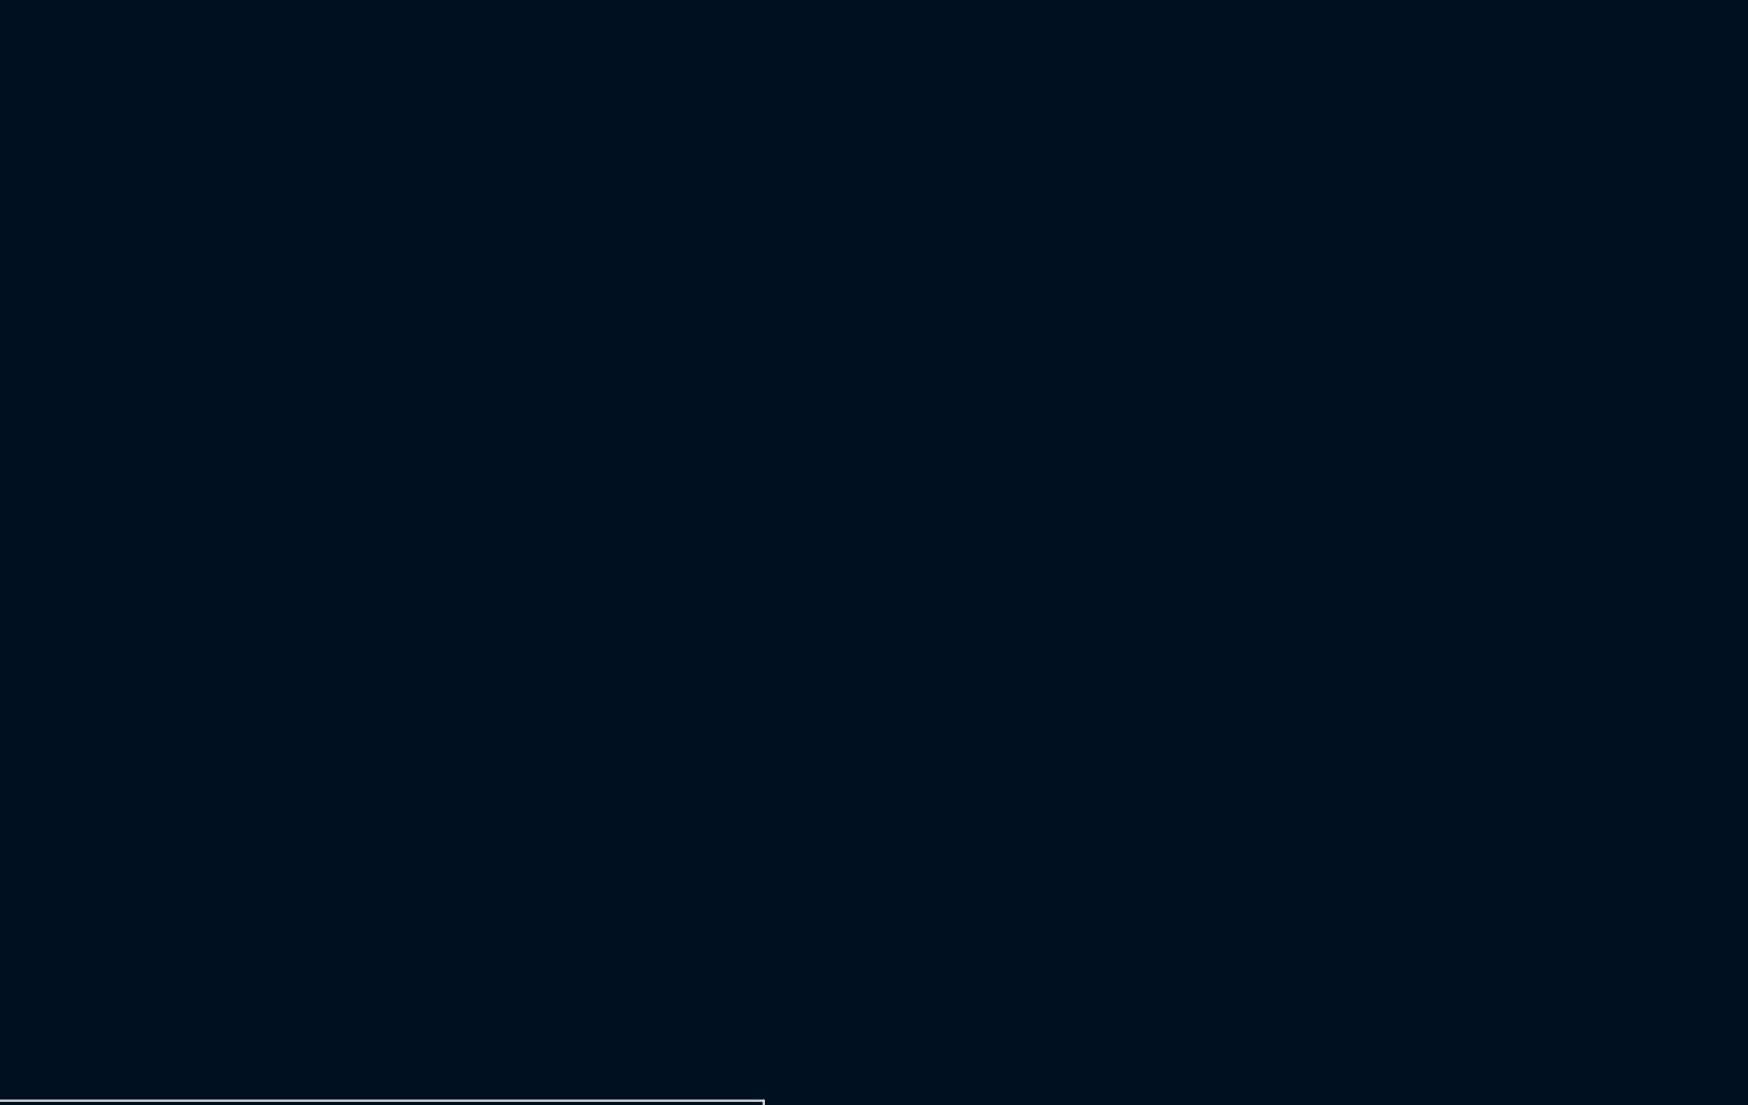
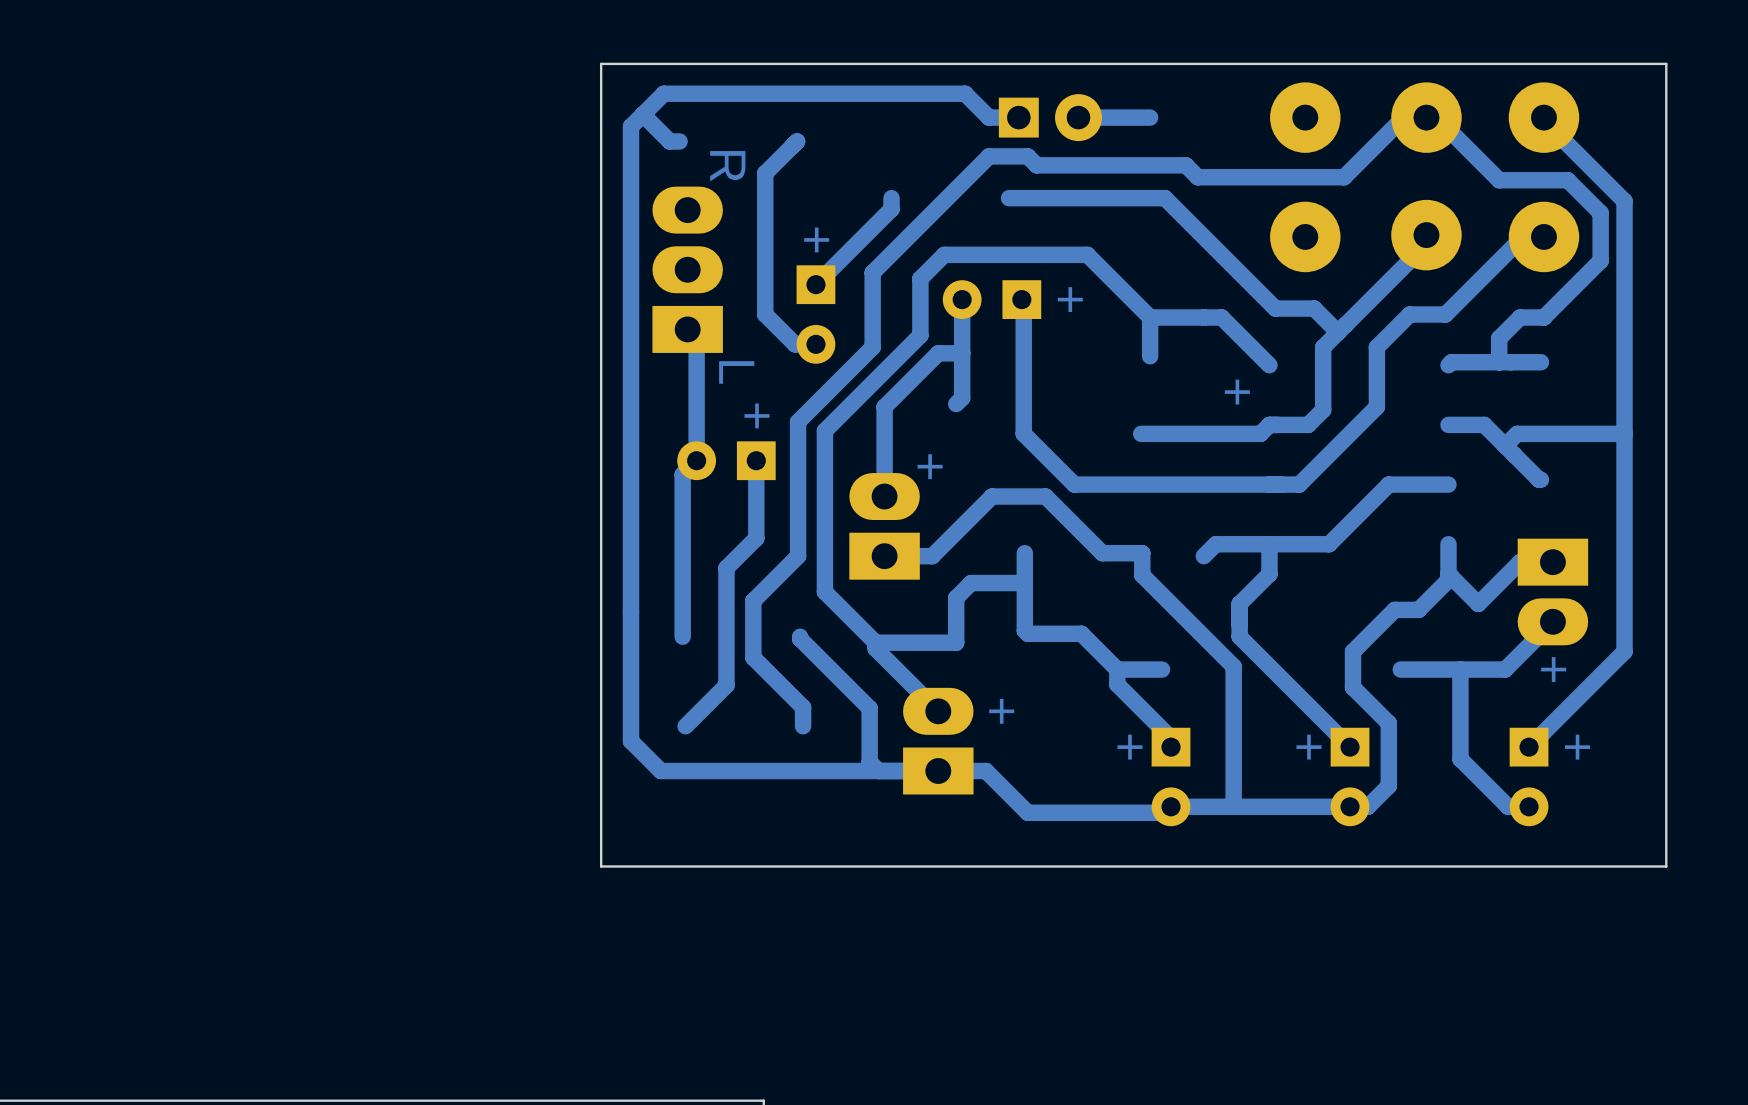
board edge: none -> (1666, 63) (601, 63) (601, 866) (1666, 866) (1666, 63)
track: none -> (642, 114) (669, 141) (679, 141)
track: none -> (1018, 117) (989, 117) (965, 93) (663, 93) (630, 126) (630, 741) (660, 771) (986, 771) (1027, 812) (1165, 812) (1171, 806) (1367, 806) (1388, 785) (1388, 723) (1353, 687) (1353, 651) (1394, 609) (1418, 609) (1451, 577)
part: none -> (1050, 117)
track: none -> (1150, 117) (1078, 117)
track: none -> (1400, 117) (1436, 117) (1499, 180) (1567, 180) (1600, 213) (1600, 260) (1543, 317) (1520, 317) (1499, 338) (1499, 362)
track: none -> (1403, 117) (1344, 177) (1197, 177) (1185, 165) (1036, 165) (1027, 156) (989, 156) (872, 272) (872, 347) (798, 421) (798, 556) (753, 600) (753, 657) (803, 707) (803, 726)
track: none -> (1543, 117) (1543, 120) (1624, 201) (1624, 651) (1529, 747)
track: none -> (797, 141) (765, 173) (765, 314) (795, 344) (815, 344)
text: none -> R (727, 166)
part: none -> (1424, 177)
track: none -> (891, 198) (891, 209) (815, 284)
track: none -> (1009, 198) (1165, 198) (1275, 308) (1314, 308) (1338, 332)
track: none -> (1426, 235) (1426, 244) (1323, 347) (1323, 409) (1308, 424) (1269, 424) (1260, 433) (1141, 433)
track: none -> (1543, 236) (1523, 236) (1445, 314) (1409, 314) (1376, 347) (1376, 407) (1299, 484) (1074, 484) (1023, 433) (1023, 301) (1021, 299)
text: none -> + (816, 239)
part: none -> (687, 269)
track: none -> (962, 299) (962, 398) (956, 404)
part: none -> (992, 299)
text: none -> + (1070, 299)
part: none -> (815, 314)
track: none -> (1150, 317) (1221, 317) (1269, 365)
track: none -> (1150, 317) (1150, 356)
track: none -> (1150, 317) (1087, 254) (944, 254) (920, 278) (920, 335) (824, 430) (824, 591) (875, 642)
track: none -> (687, 329) (696, 338) (696, 460) (682, 474) (682, 636)
track: none -> (962, 353) (938, 353) (884, 407) (884, 496)
track: none -> (1540, 362) (1451, 362) (1448, 365)
text: none -> L (736, 372)
text: none -> + (1237, 392)
text: none -> + (757, 415)
track: none -> (1448, 424) (1484, 424) (1540, 479)
track: none -> (1624, 433) (1517, 433) (1505, 445)
part: none -> (726, 460)
track: none -> (756, 460) (756, 538) (726, 568) (726, 685) (685, 726)
text: none -> + (930, 466)
track: none -> (1448, 484) (1388, 484) (1329, 544) (1215, 544) (1203, 556)
part: none -> (884, 526)
track: none -> (1269, 544) (1269, 574) (1239, 603) (1239, 636) (1350, 747)
track: none -> (1448, 544) (1448, 574) (1478, 603) (1520, 562) (1552, 562)
track: none -> (1024, 553) (1024, 630) (1027, 633) (1081, 633) (1117, 669)
track: none -> (884, 556) (932, 556) (992, 496) (1045, 496) (1102, 553) (1142, 553) (1142, 575) (1233, 666) (1233, 806)
track: none -> (1024, 583) (971, 583) (956, 597) (956, 642) (875, 642)
part: none -> (1552, 591)
track: none -> (1552, 621) (1505, 669) (1400, 669)
track: none -> (800, 636) (869, 708) (869, 762) (878, 771)
track: none -> (875, 642) (875, 648) (938, 711)
track: none -> (1117, 669) (1117, 684) (1171, 738) (1171, 747)
track: none -> (1162, 669) (1117, 669)
track: none -> (1460, 669) (1460, 759) (1508, 806) (1529, 806)
text: none -> + (1553, 669)
text: none -> + (1001, 711)
part: none -> (938, 741)
text: none -> + (1129, 747)
text: none -> + (1309, 747)
text: none -> + (1577, 747)
part: none -> (1171, 776)
part: none -> (1350, 776)
part: none -> (1529, 776)

